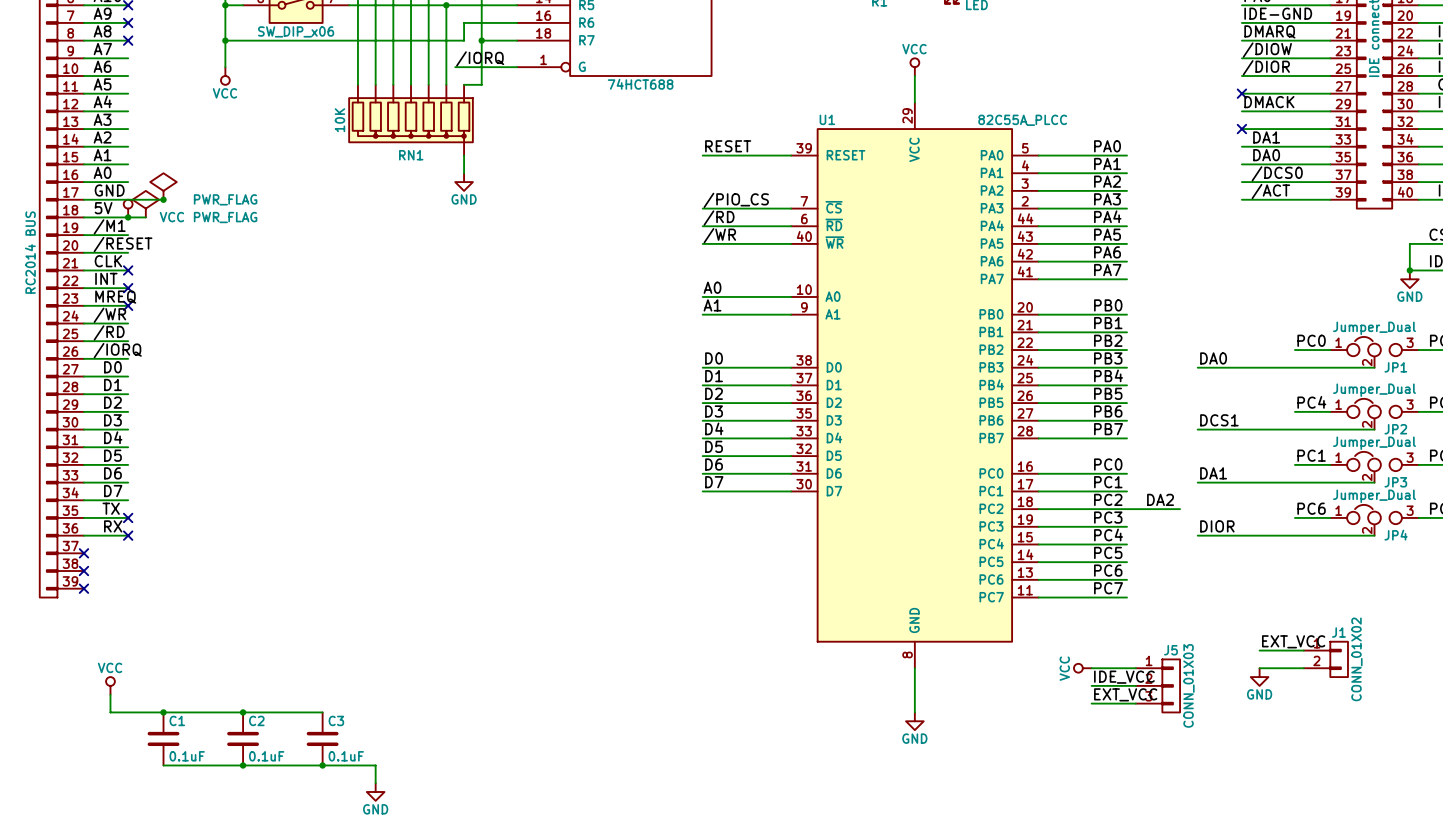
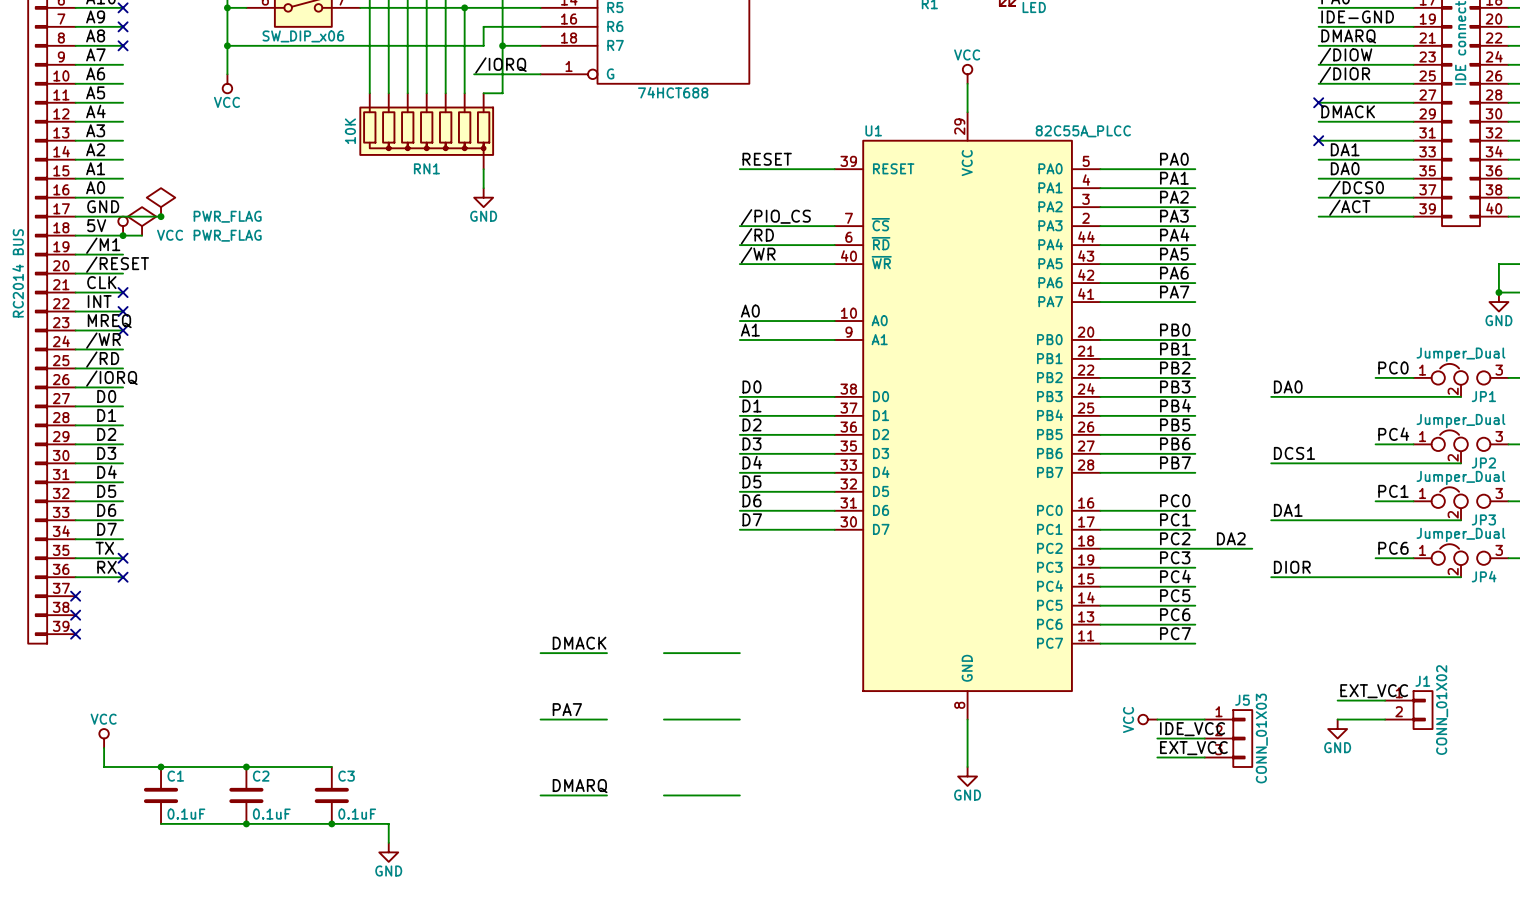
label: none -> DMACK (579, 643)
wire: none -> (540, 653) (606, 653)
wire: none -> (663, 653) (739, 653)
label: none -> PA7 (567, 709)
wire: none -> (540, 719) (606, 719)
wire: none -> (663, 719) (739, 719)
label: none -> DMARQ (580, 786)
wire: none -> (540, 795) (606, 795)
wire: none -> (663, 795) (739, 795)

